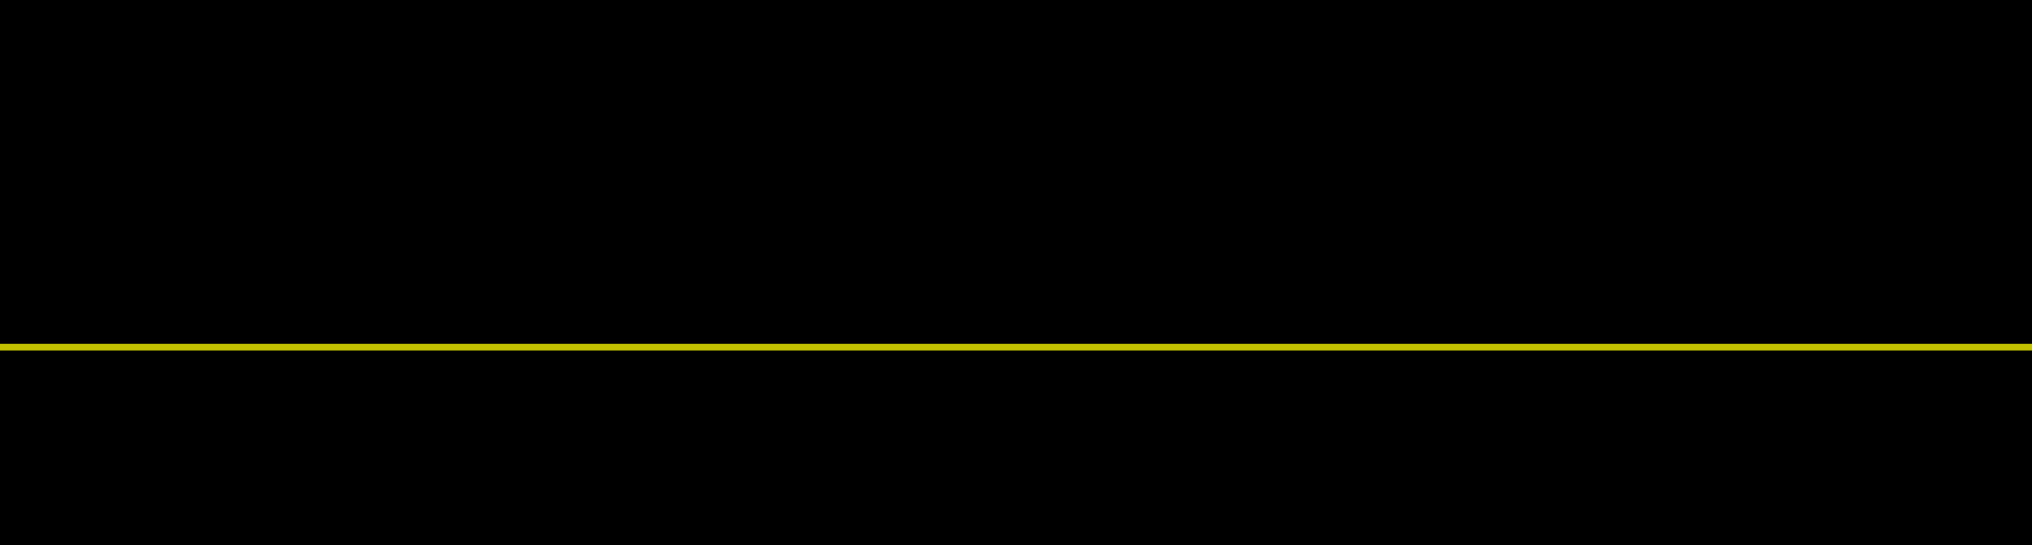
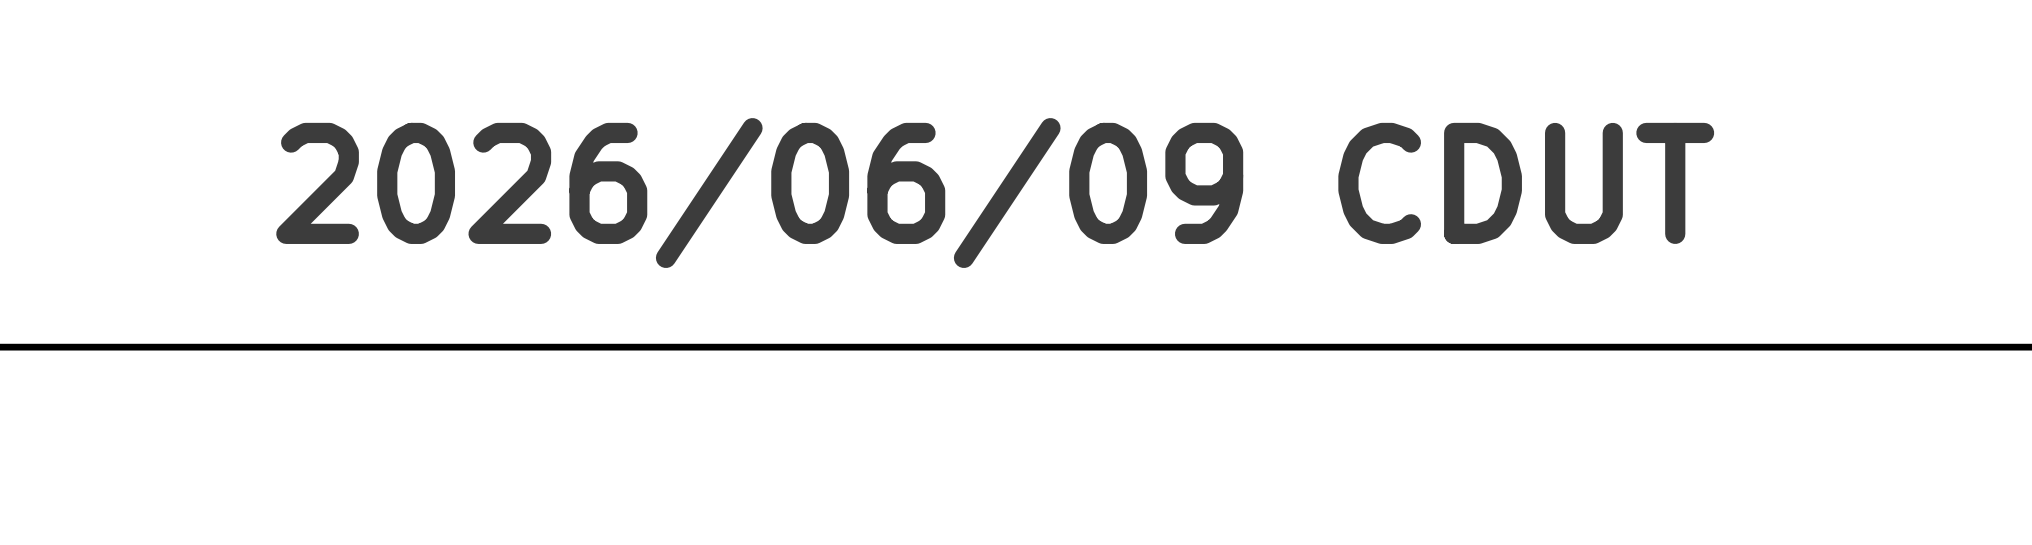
text: none -> 2026/06/09 CDUT (995, 193)

